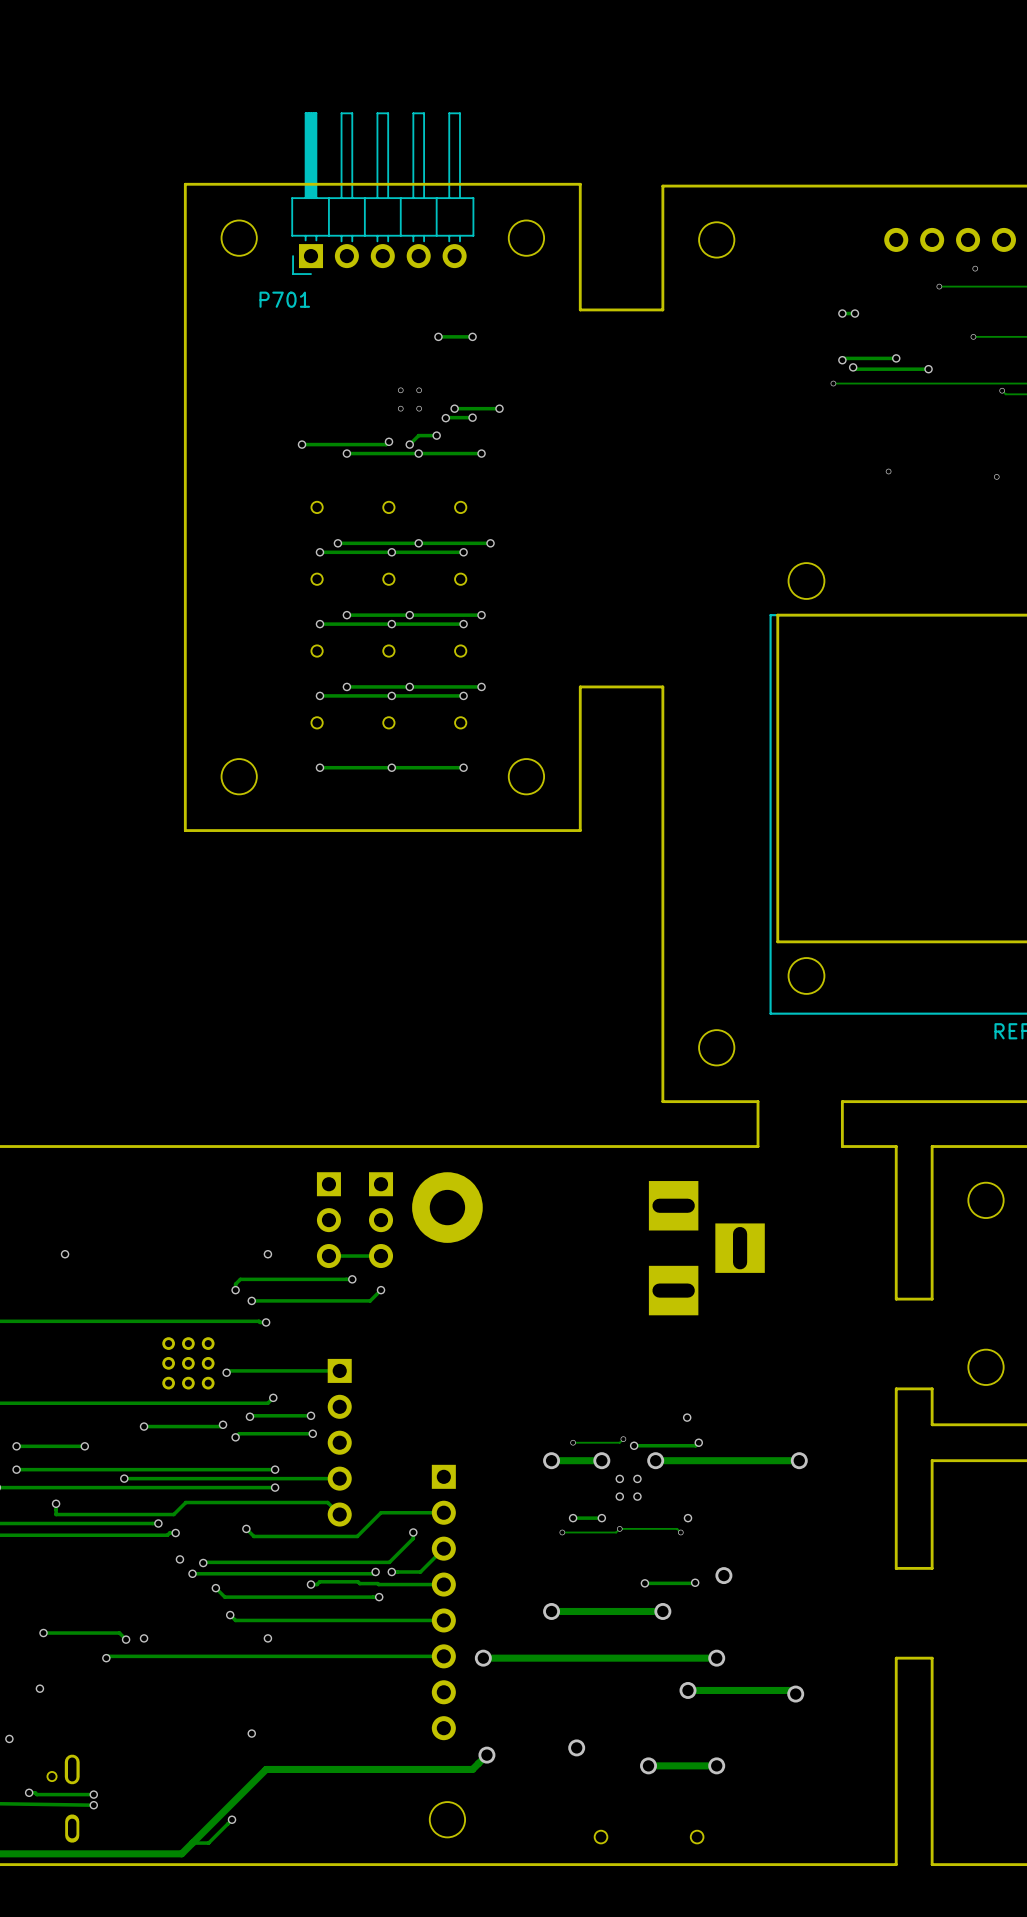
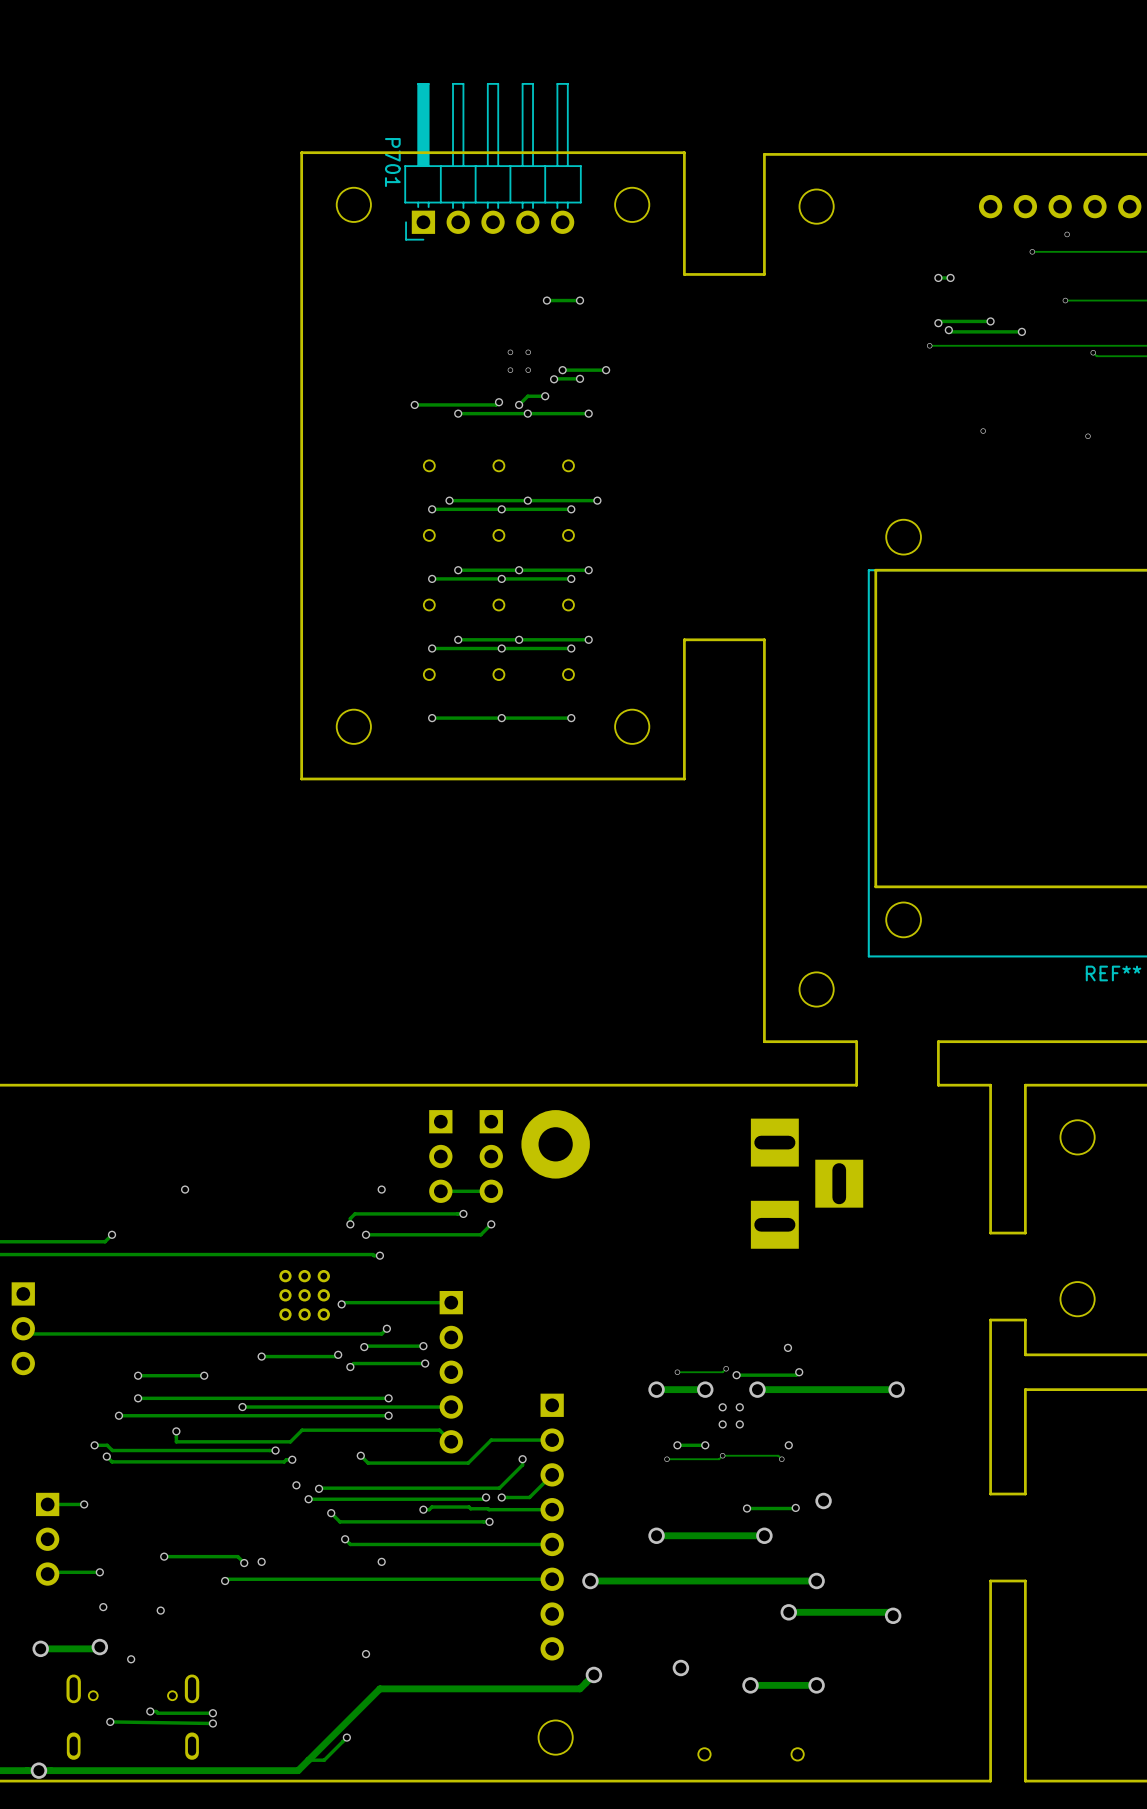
P701 name rotation: 0° (284, 299) -> 90° clockwise (392, 162)
P701 name position: P701 (284, 299) -> P701 (392, 162)

